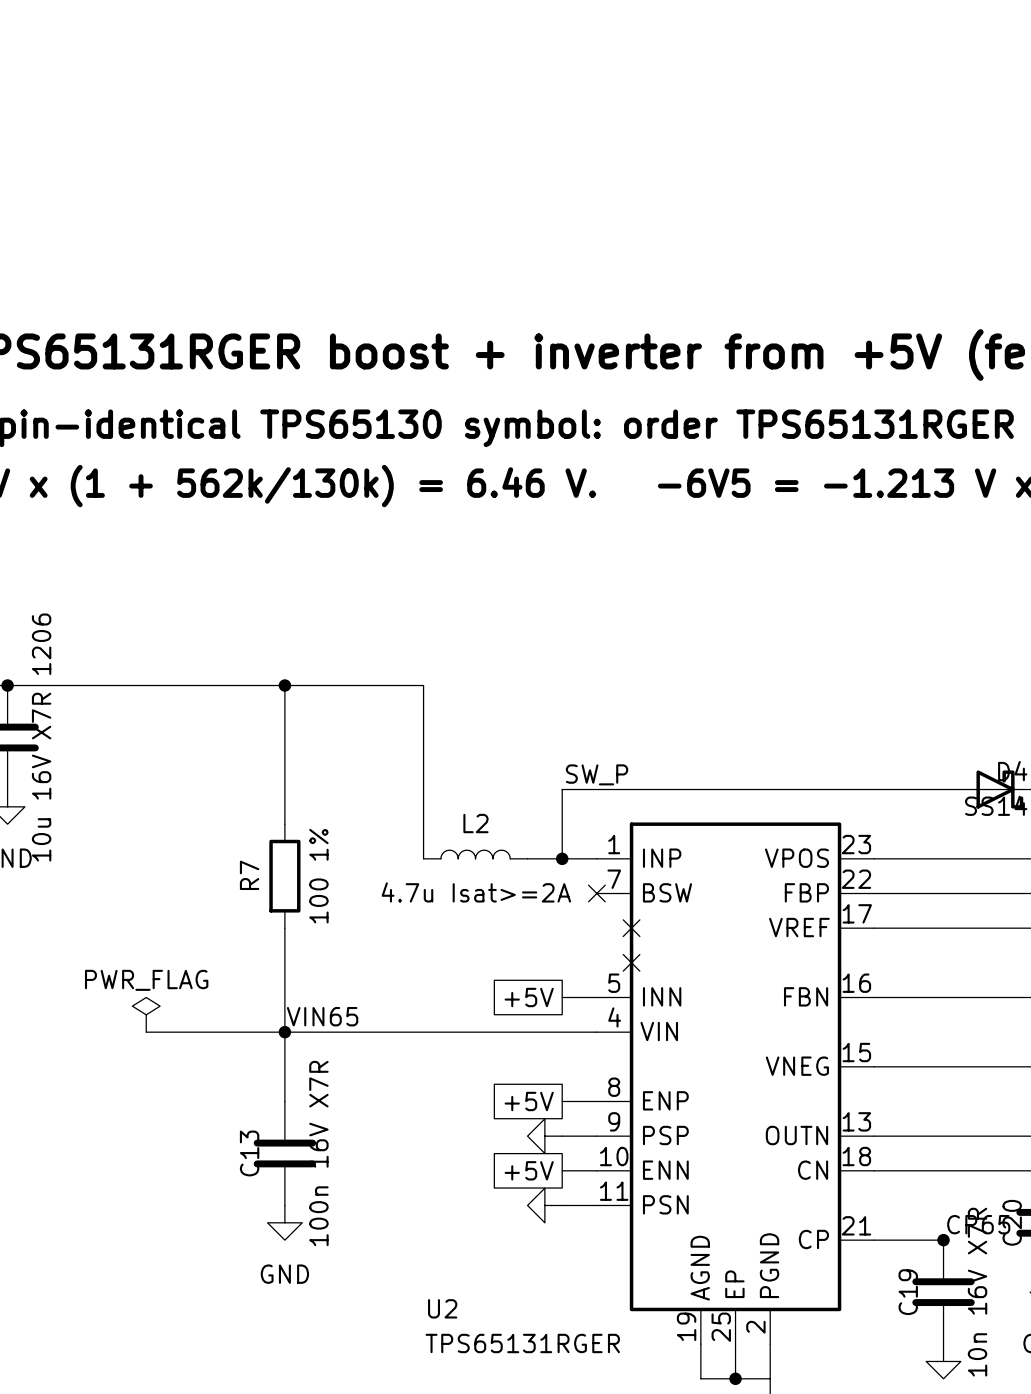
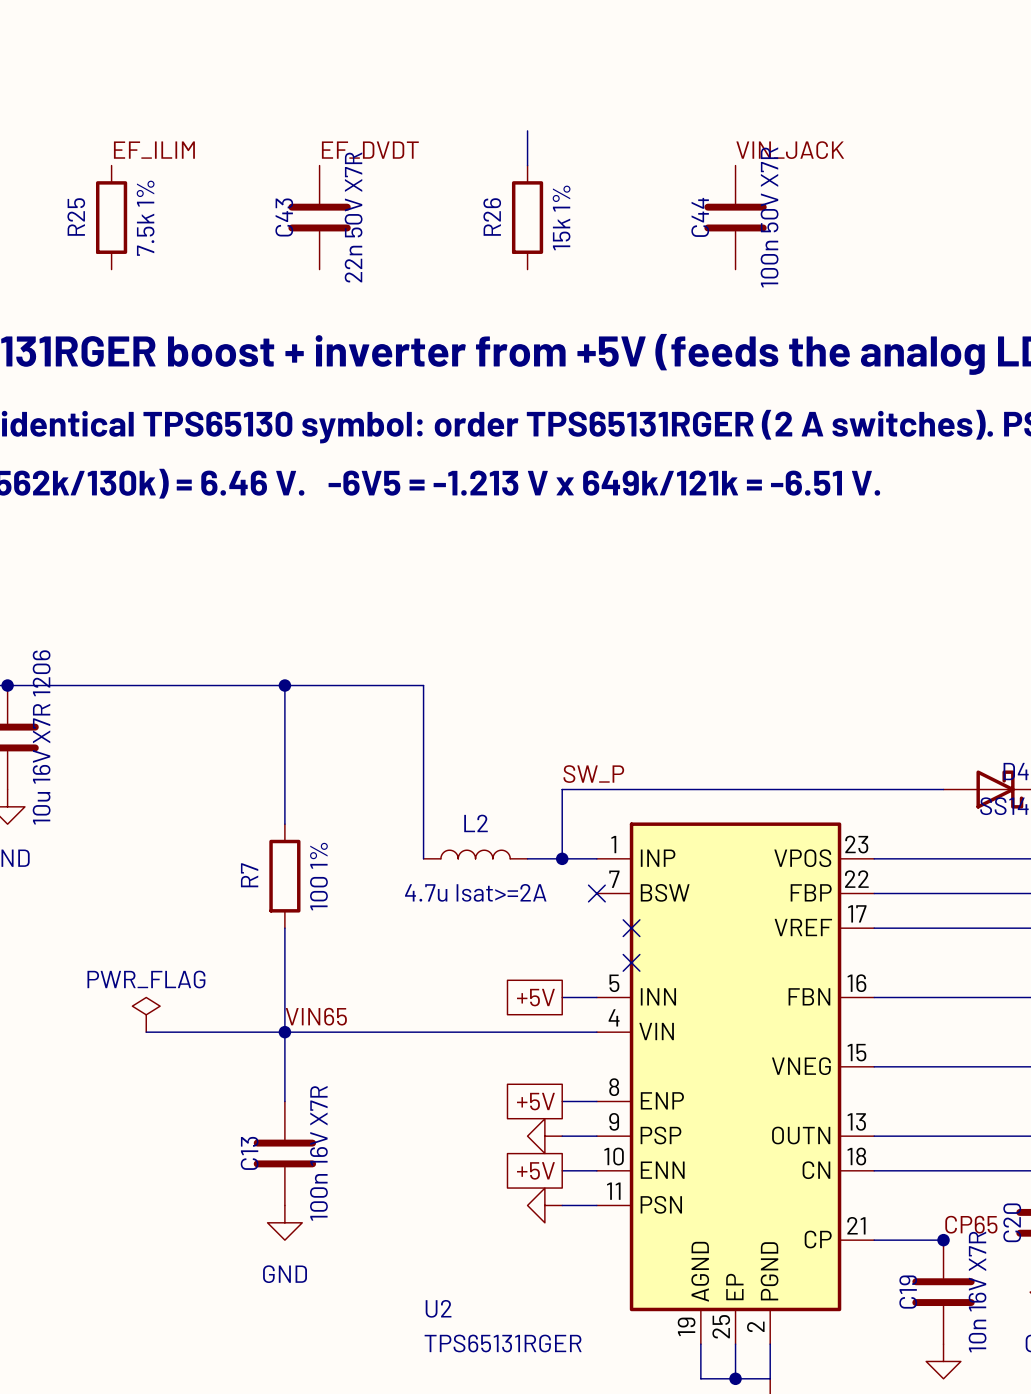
wire: none -> (527, 130) (527, 165)
label: none -> EF_ILIM (154, 150)
label: none -> EF_DVDT (370, 150)
label: none -> VIN_JACK (790, 150)
R25: none -> 7.5k 1% (111, 217)
C43: none -> 22n 50V X7R (319, 217)
R26: none -> 15k 1% (527, 217)
C44: none -> 100n 50V X7R (735, 217)

